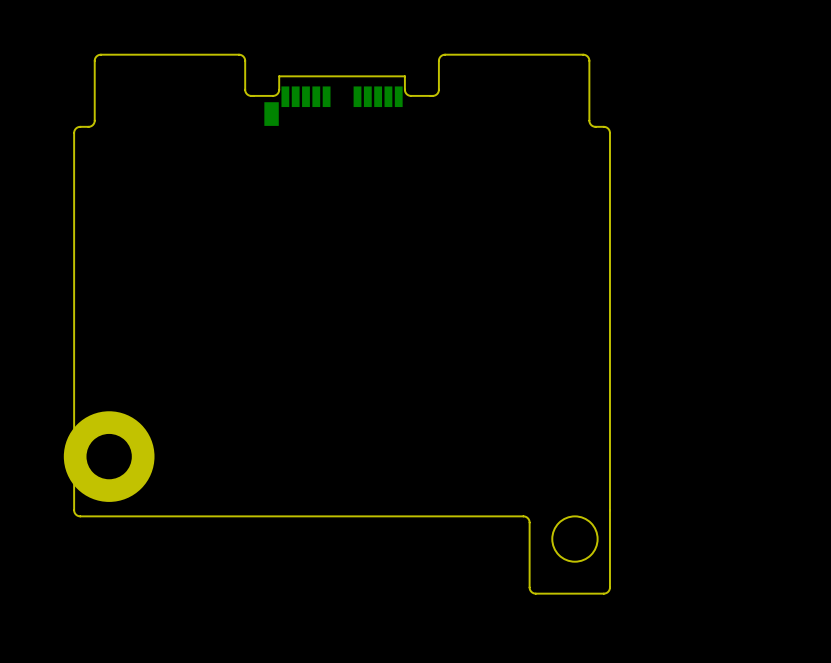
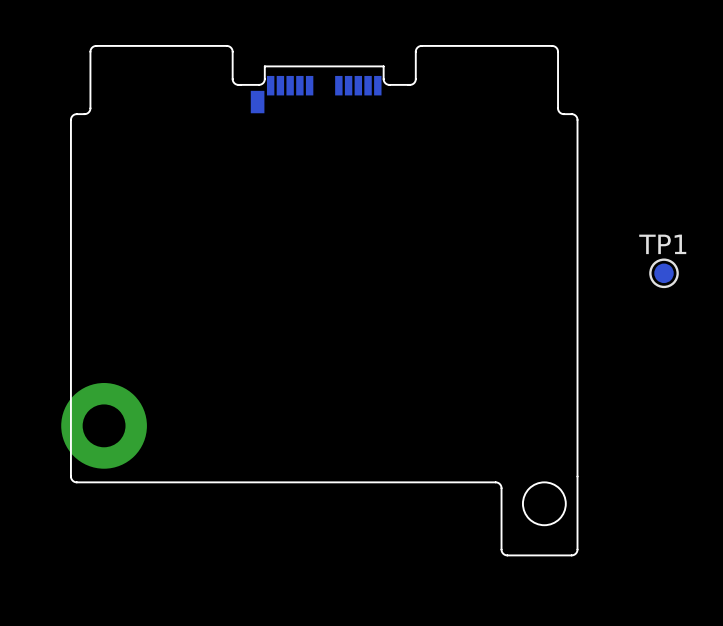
TP1: none -> (664, 273)

